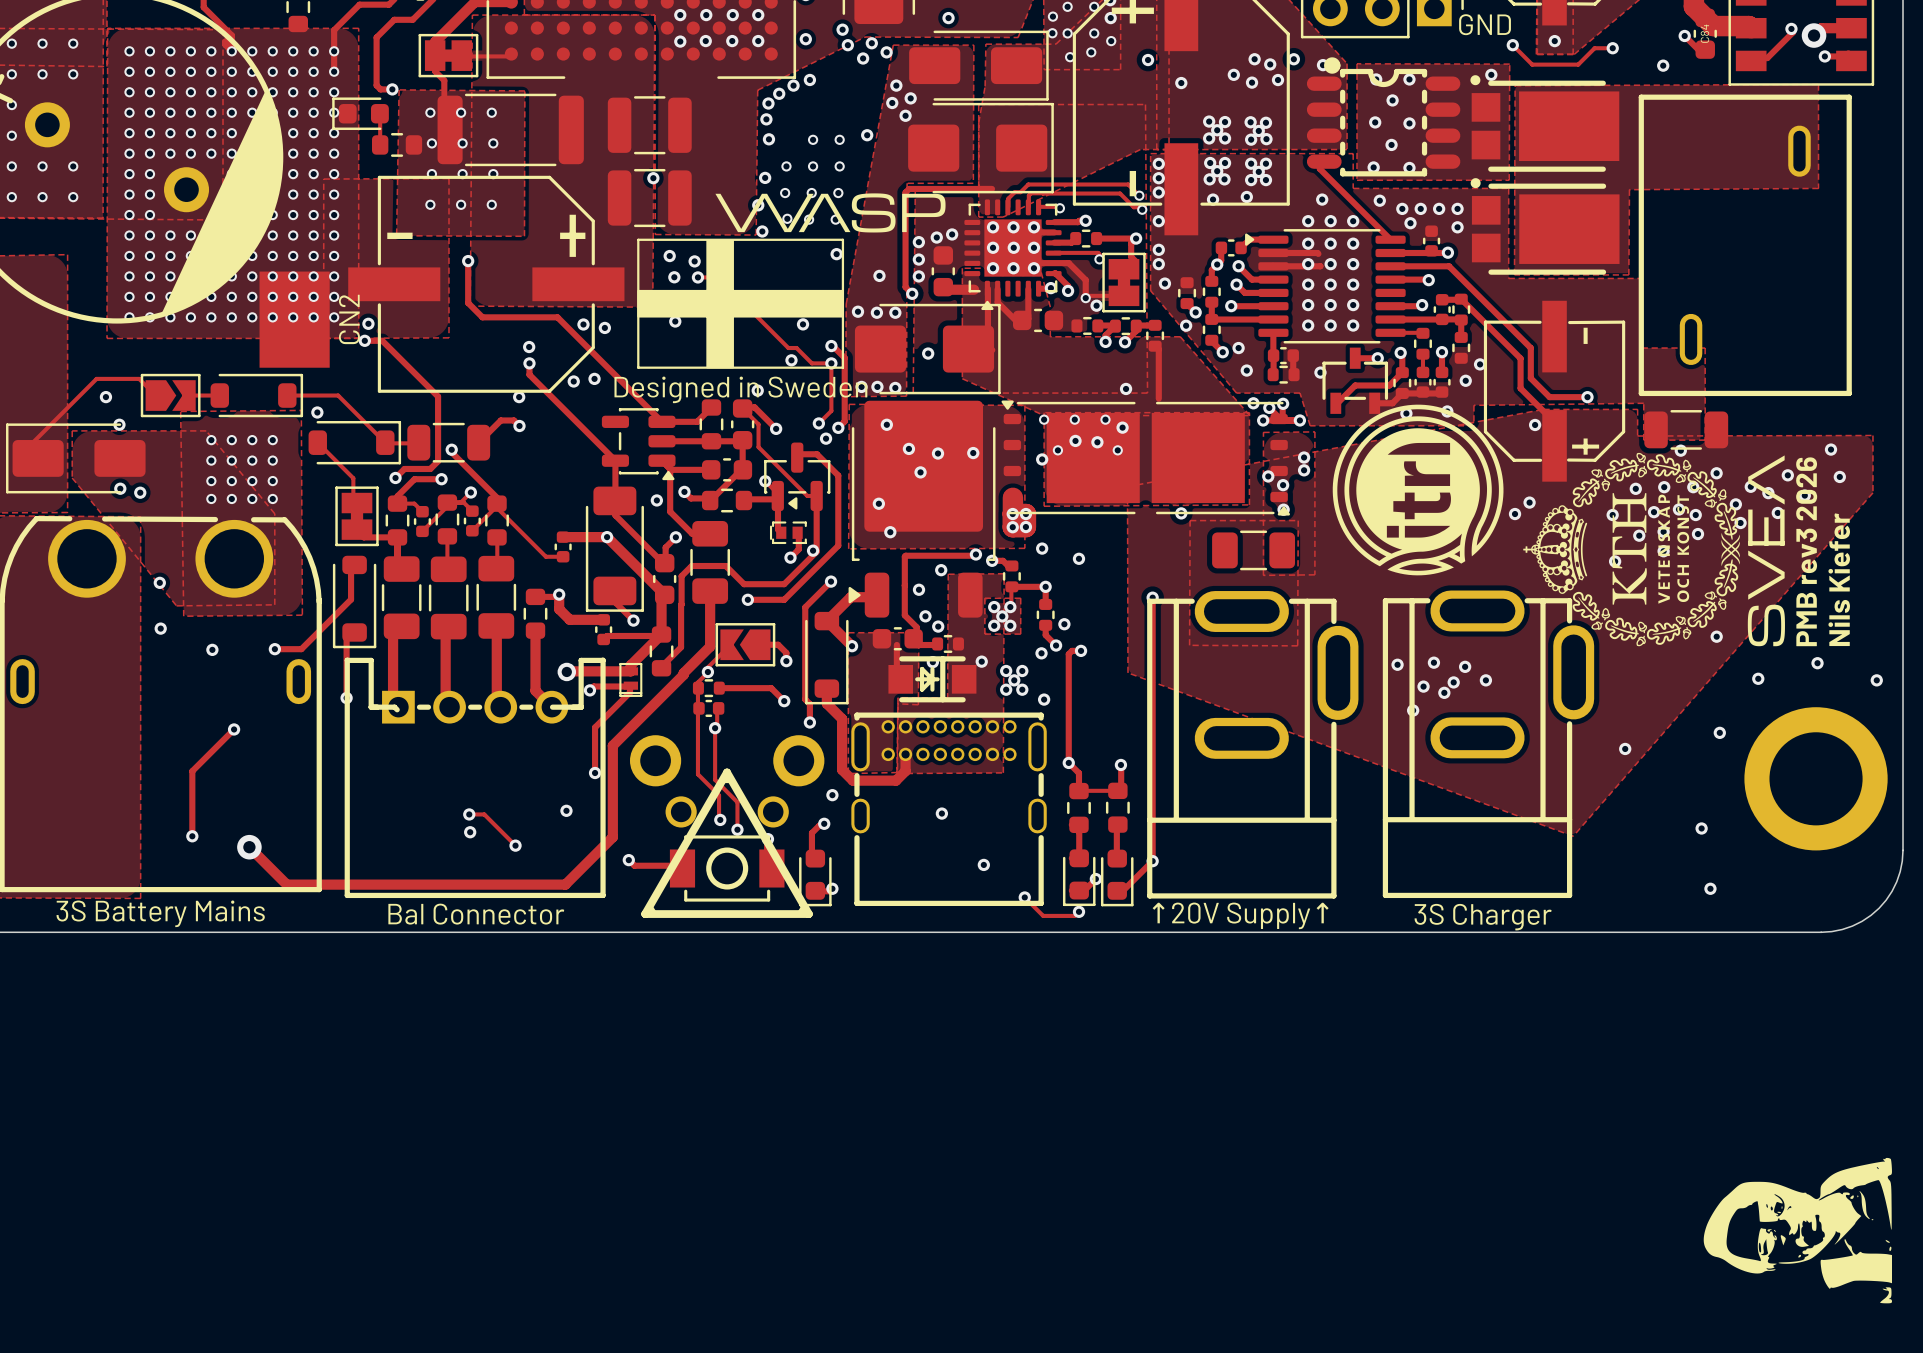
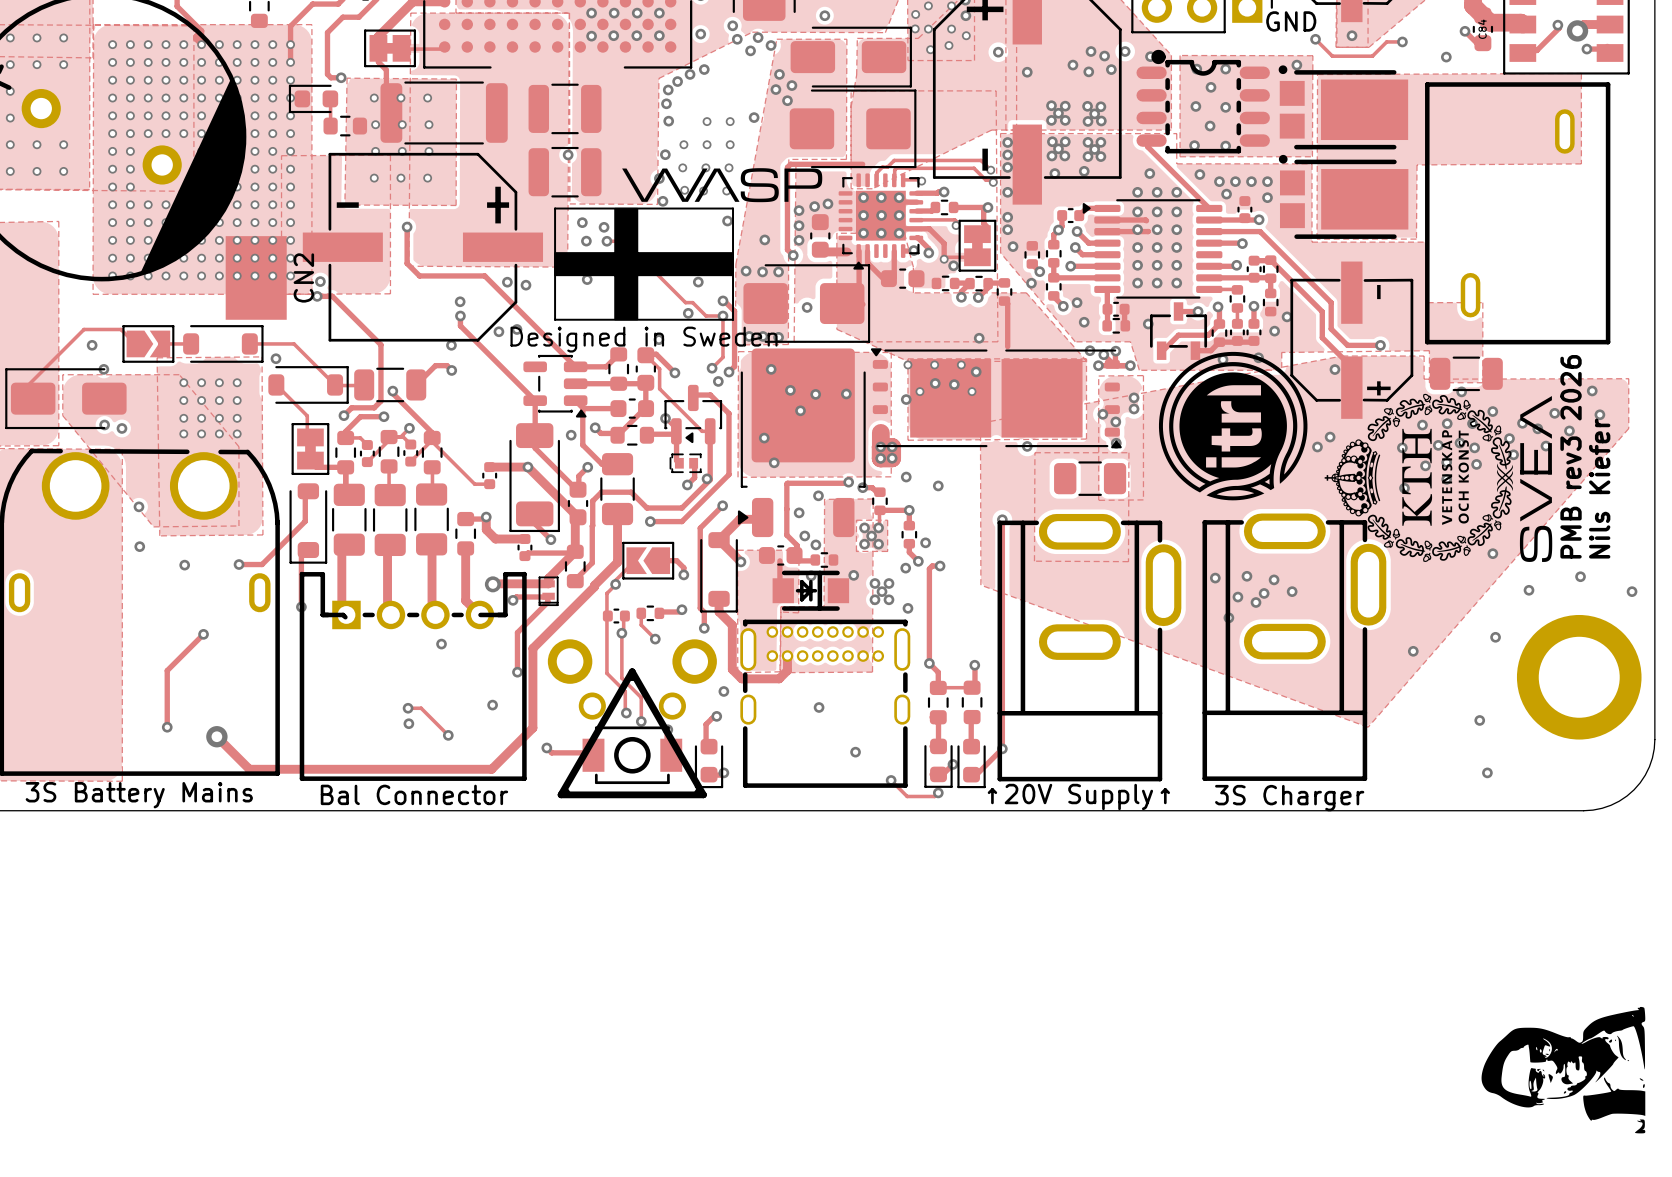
part position: (708, 688) -> (650, 613)
track: (719, 688) (771, 688) (784, 701) -> none
track: none -> (679, 611) (659, 613)
track: none -> (641, 613) (641, 625) (655, 639)
via: none -> (655, 639)
via: none -> (441, 644)

